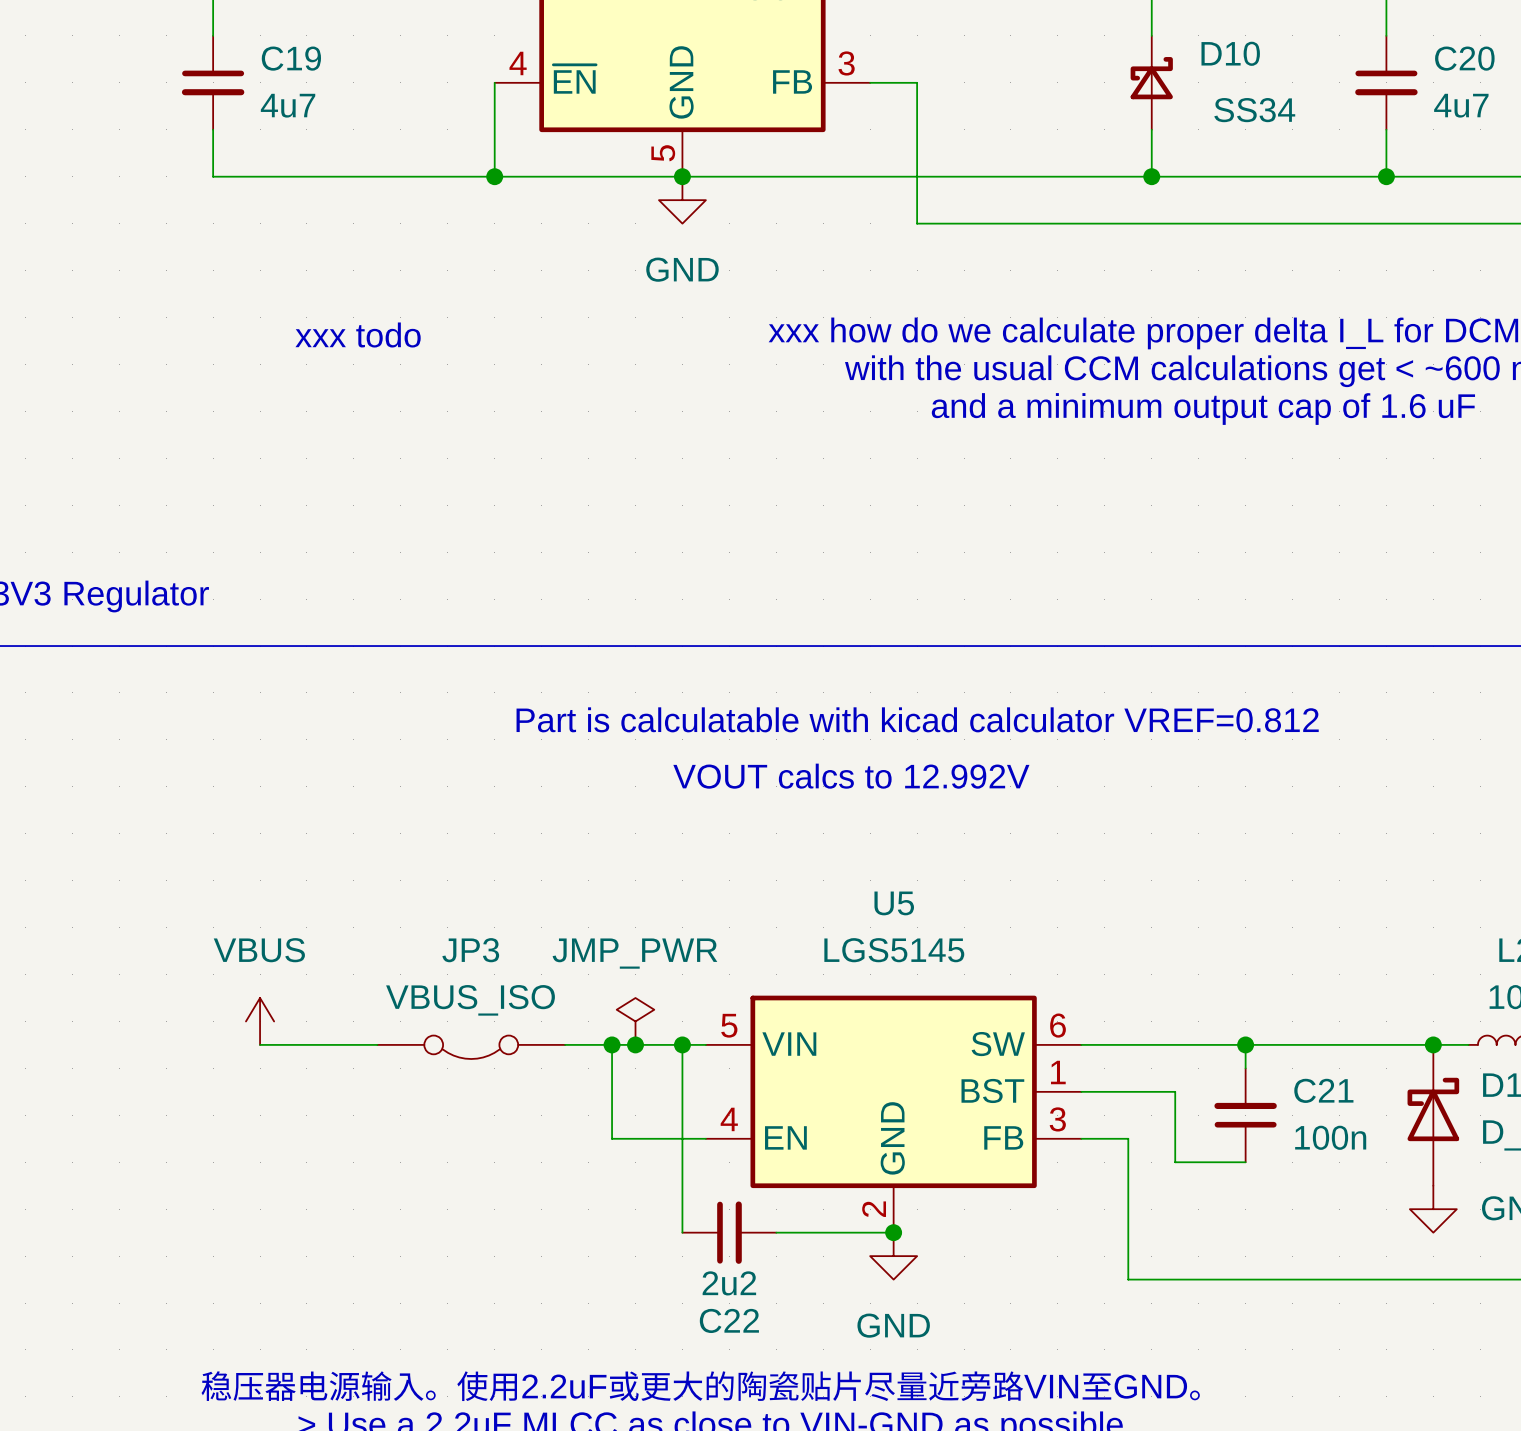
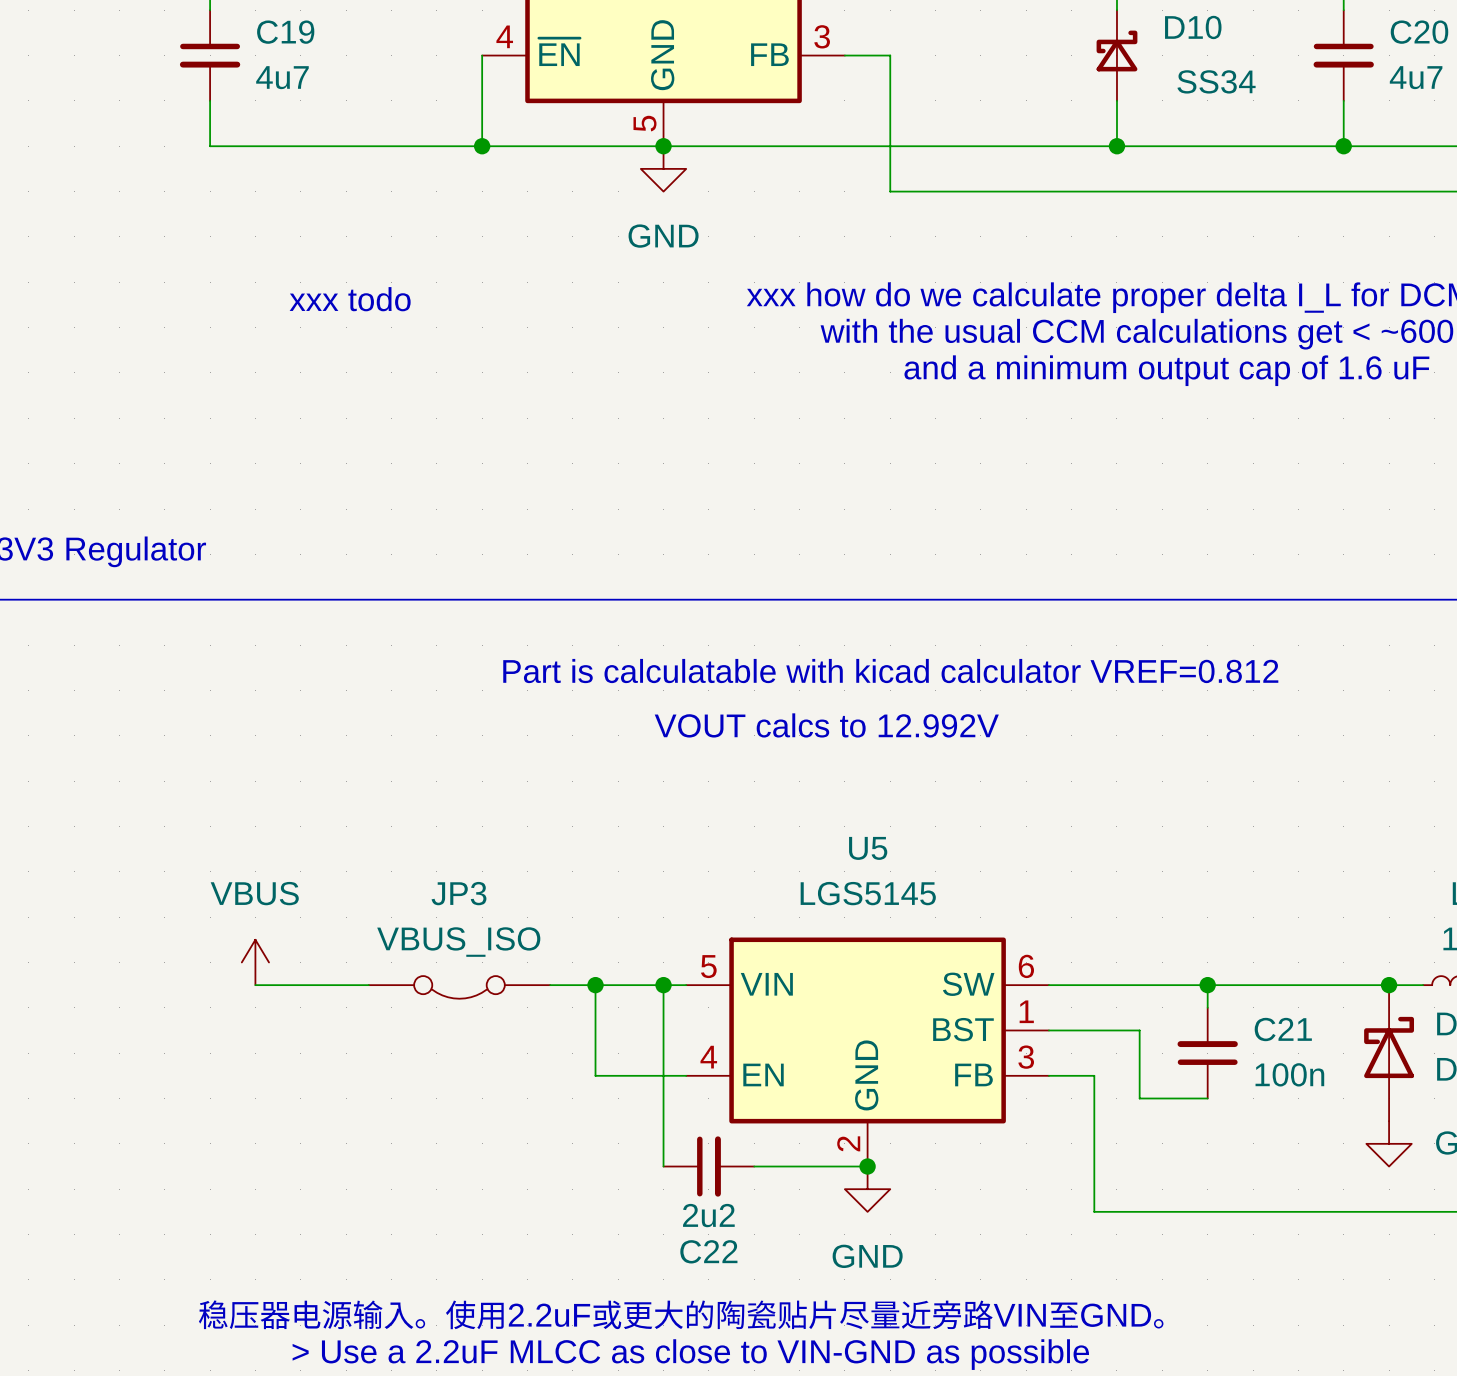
power symbol: JMP_PWR (635, 1021) -> none
junction: (635, 1044) -> none

